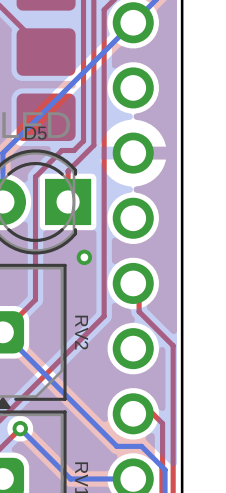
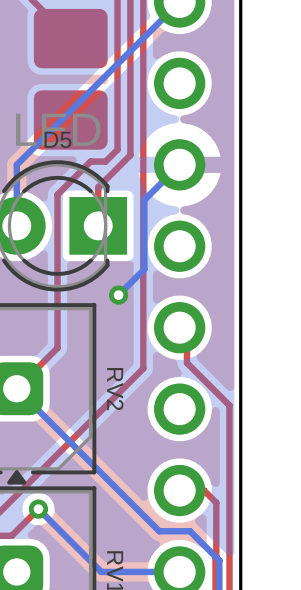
bottom track: none -> (179, 164) (144, 200) (144, 269) (118, 295)

